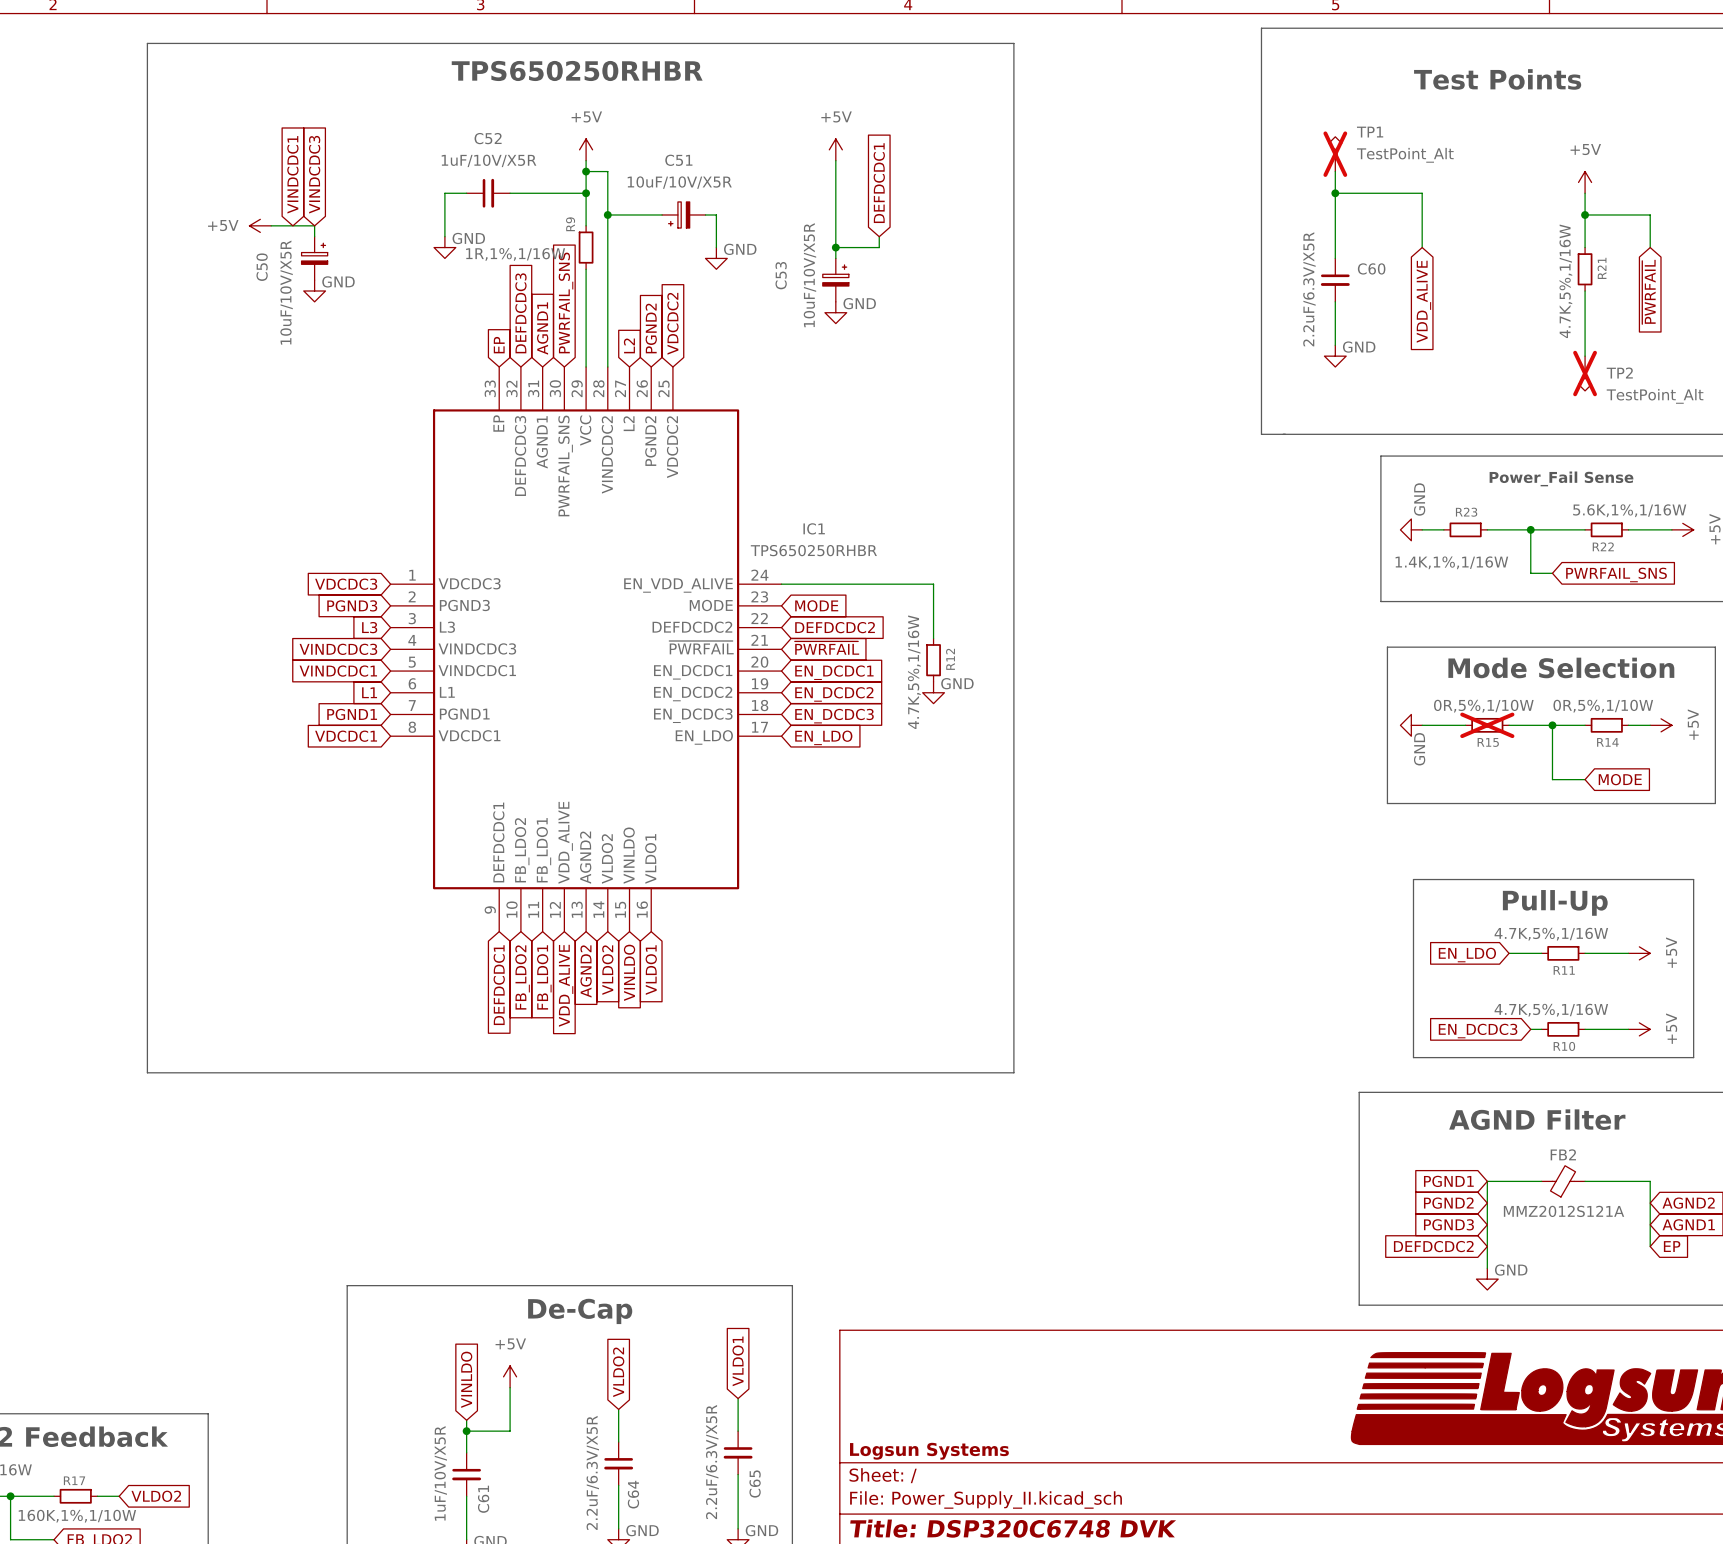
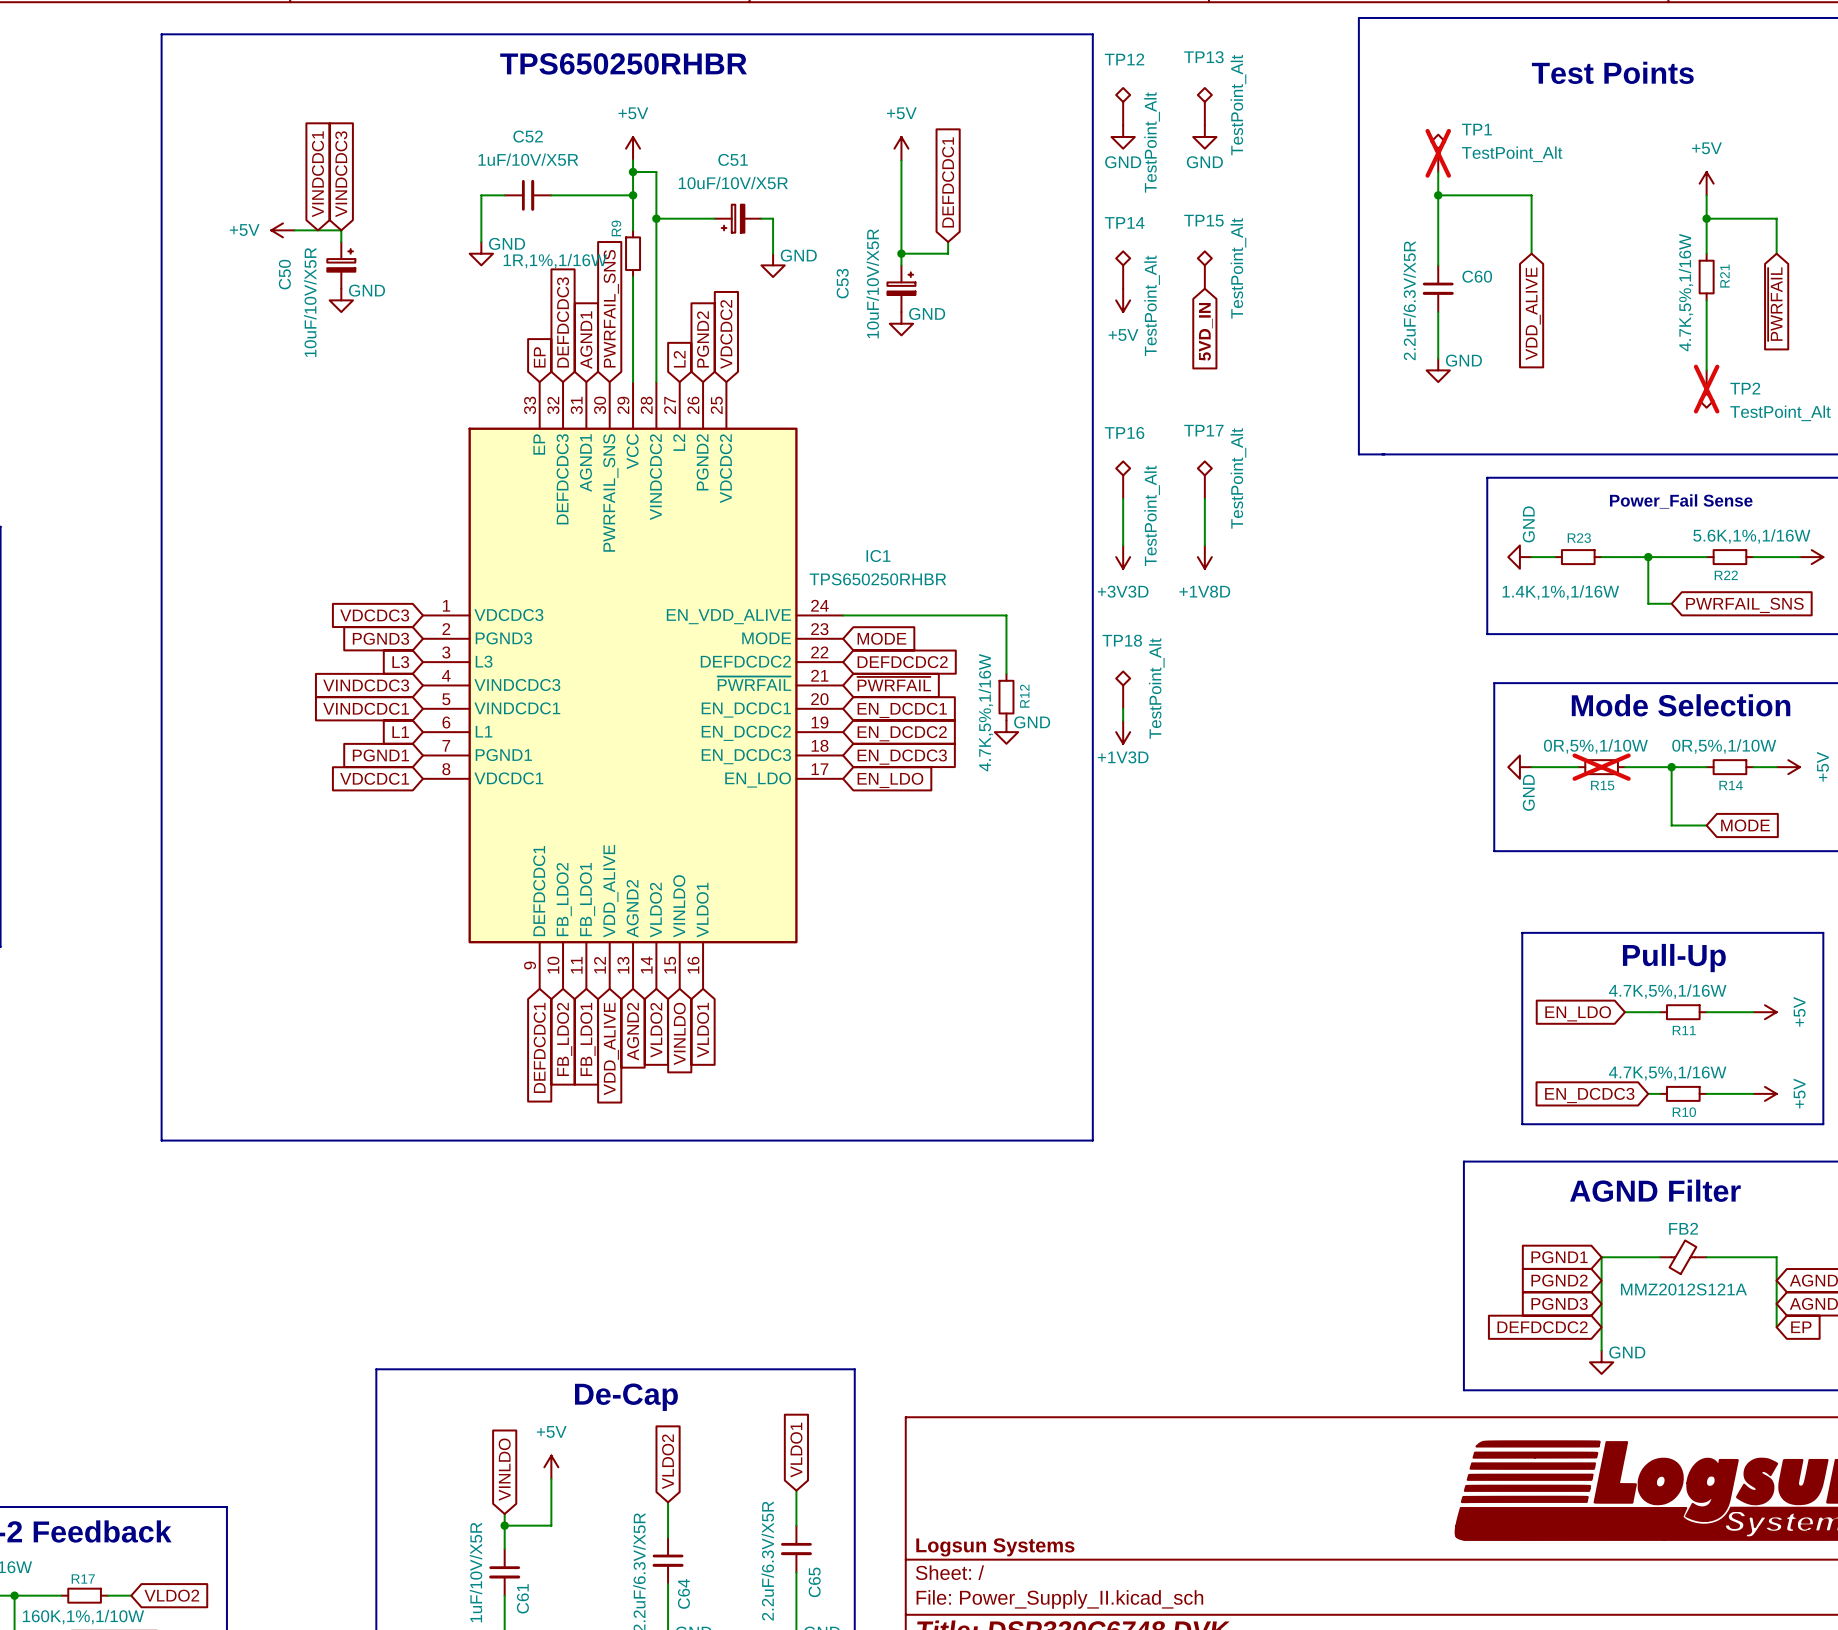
TP12: none -> TestPoint_Alt (1123, 106)
TP13: none -> TestPoint_Alt (1204, 106)
power symbol: none -> GND (1123, 137)
power symbol: none -> GND (1204, 137)
TP14: none -> TestPoint_Alt (1123, 270)
TP15: none -> TestPoint_Alt (1204, 270)
power symbol: none -> +5V (1123, 300)
global label: none -> 5VD_IN (1205, 331)
TP16: none -> TestPoint_Alt (1123, 480)
TP17: none -> TestPoint_Alt (1204, 480)
wire: none -> (1123, 498) (1123, 545)
wire: none -> (1204, 498) (1204, 545)
power symbol: none -> +3V3D (1123, 557)
power symbol: none -> +1V8D (1204, 557)
TP18: none -> TestPoint_Alt (1123, 690)
wire: none -> (1123, 708) (1123, 720)
power symbol: none -> +1V3D (1123, 732)

